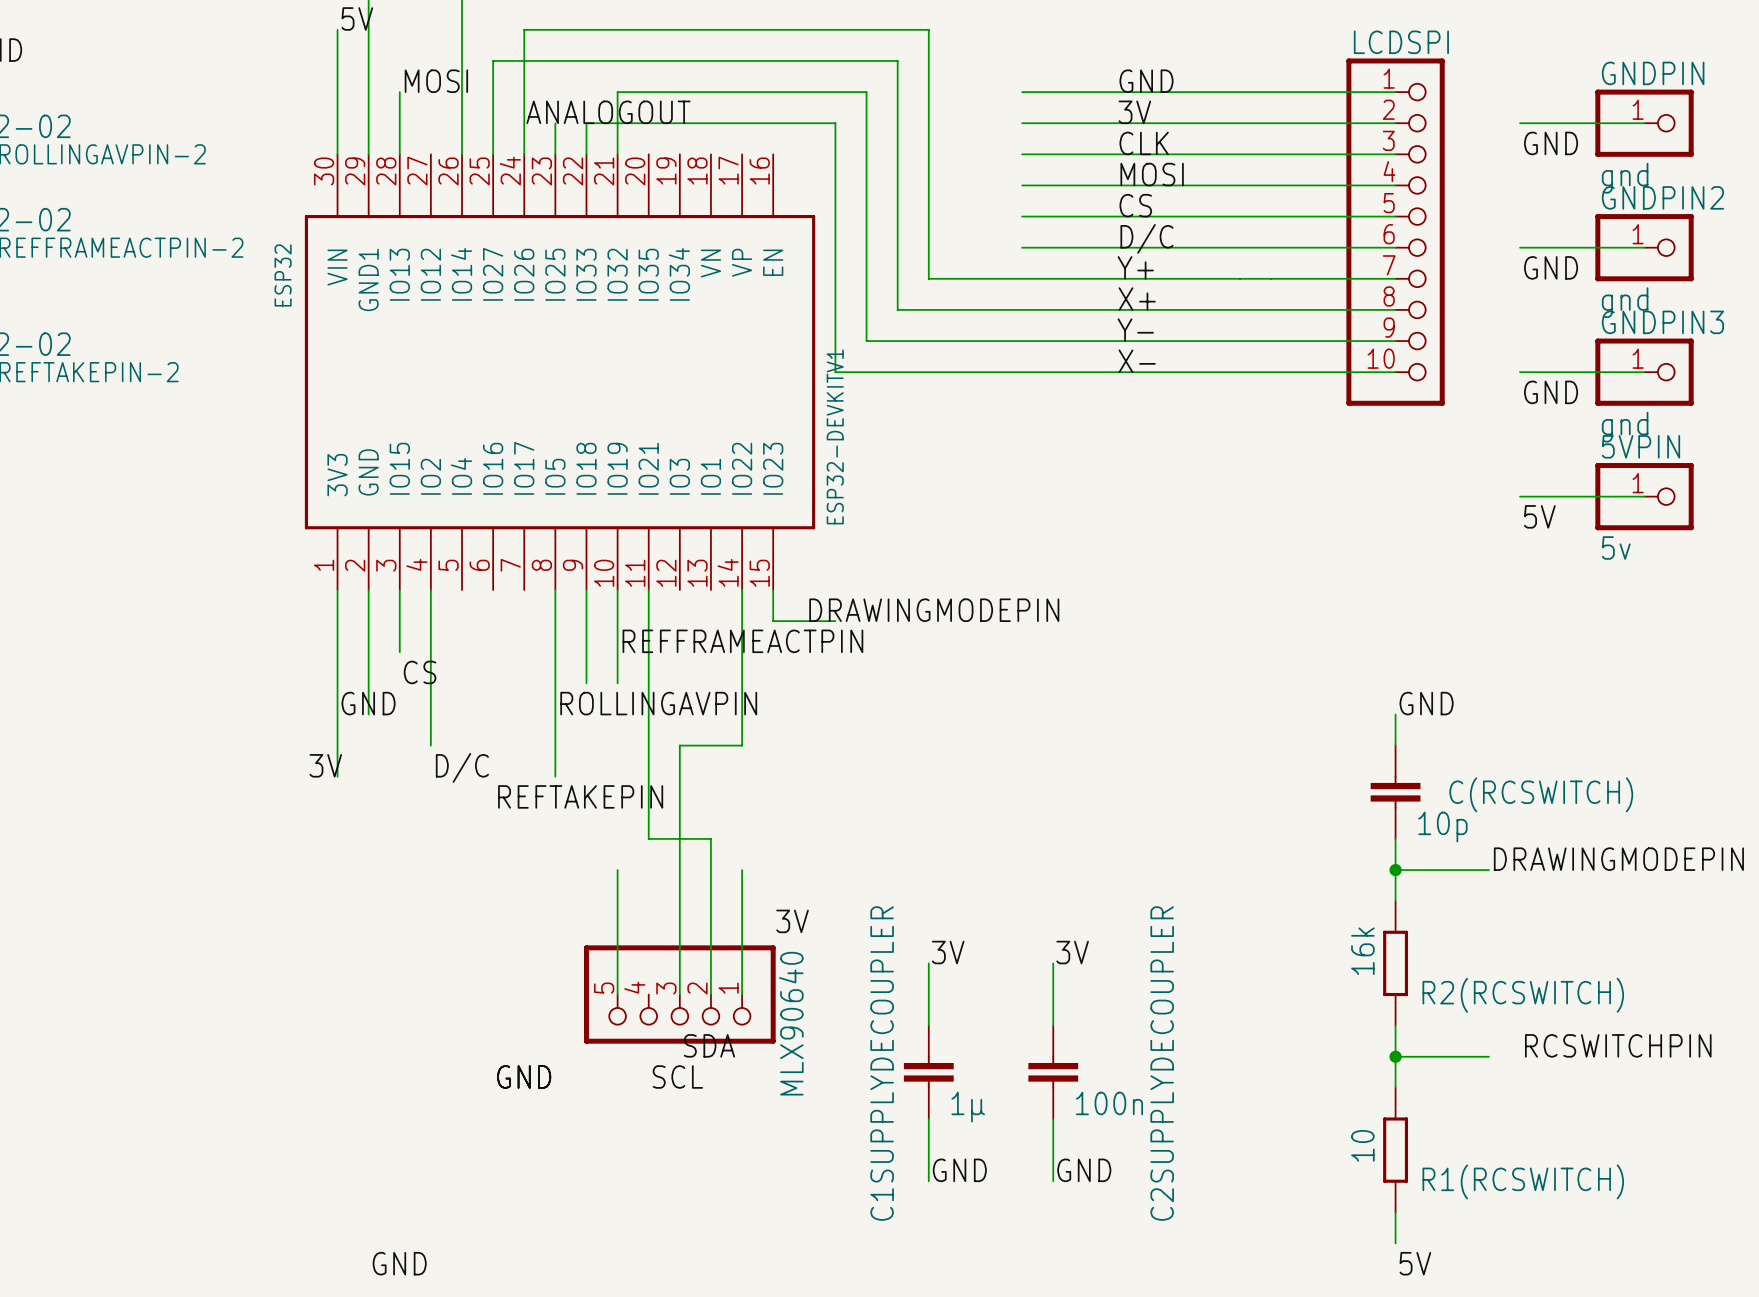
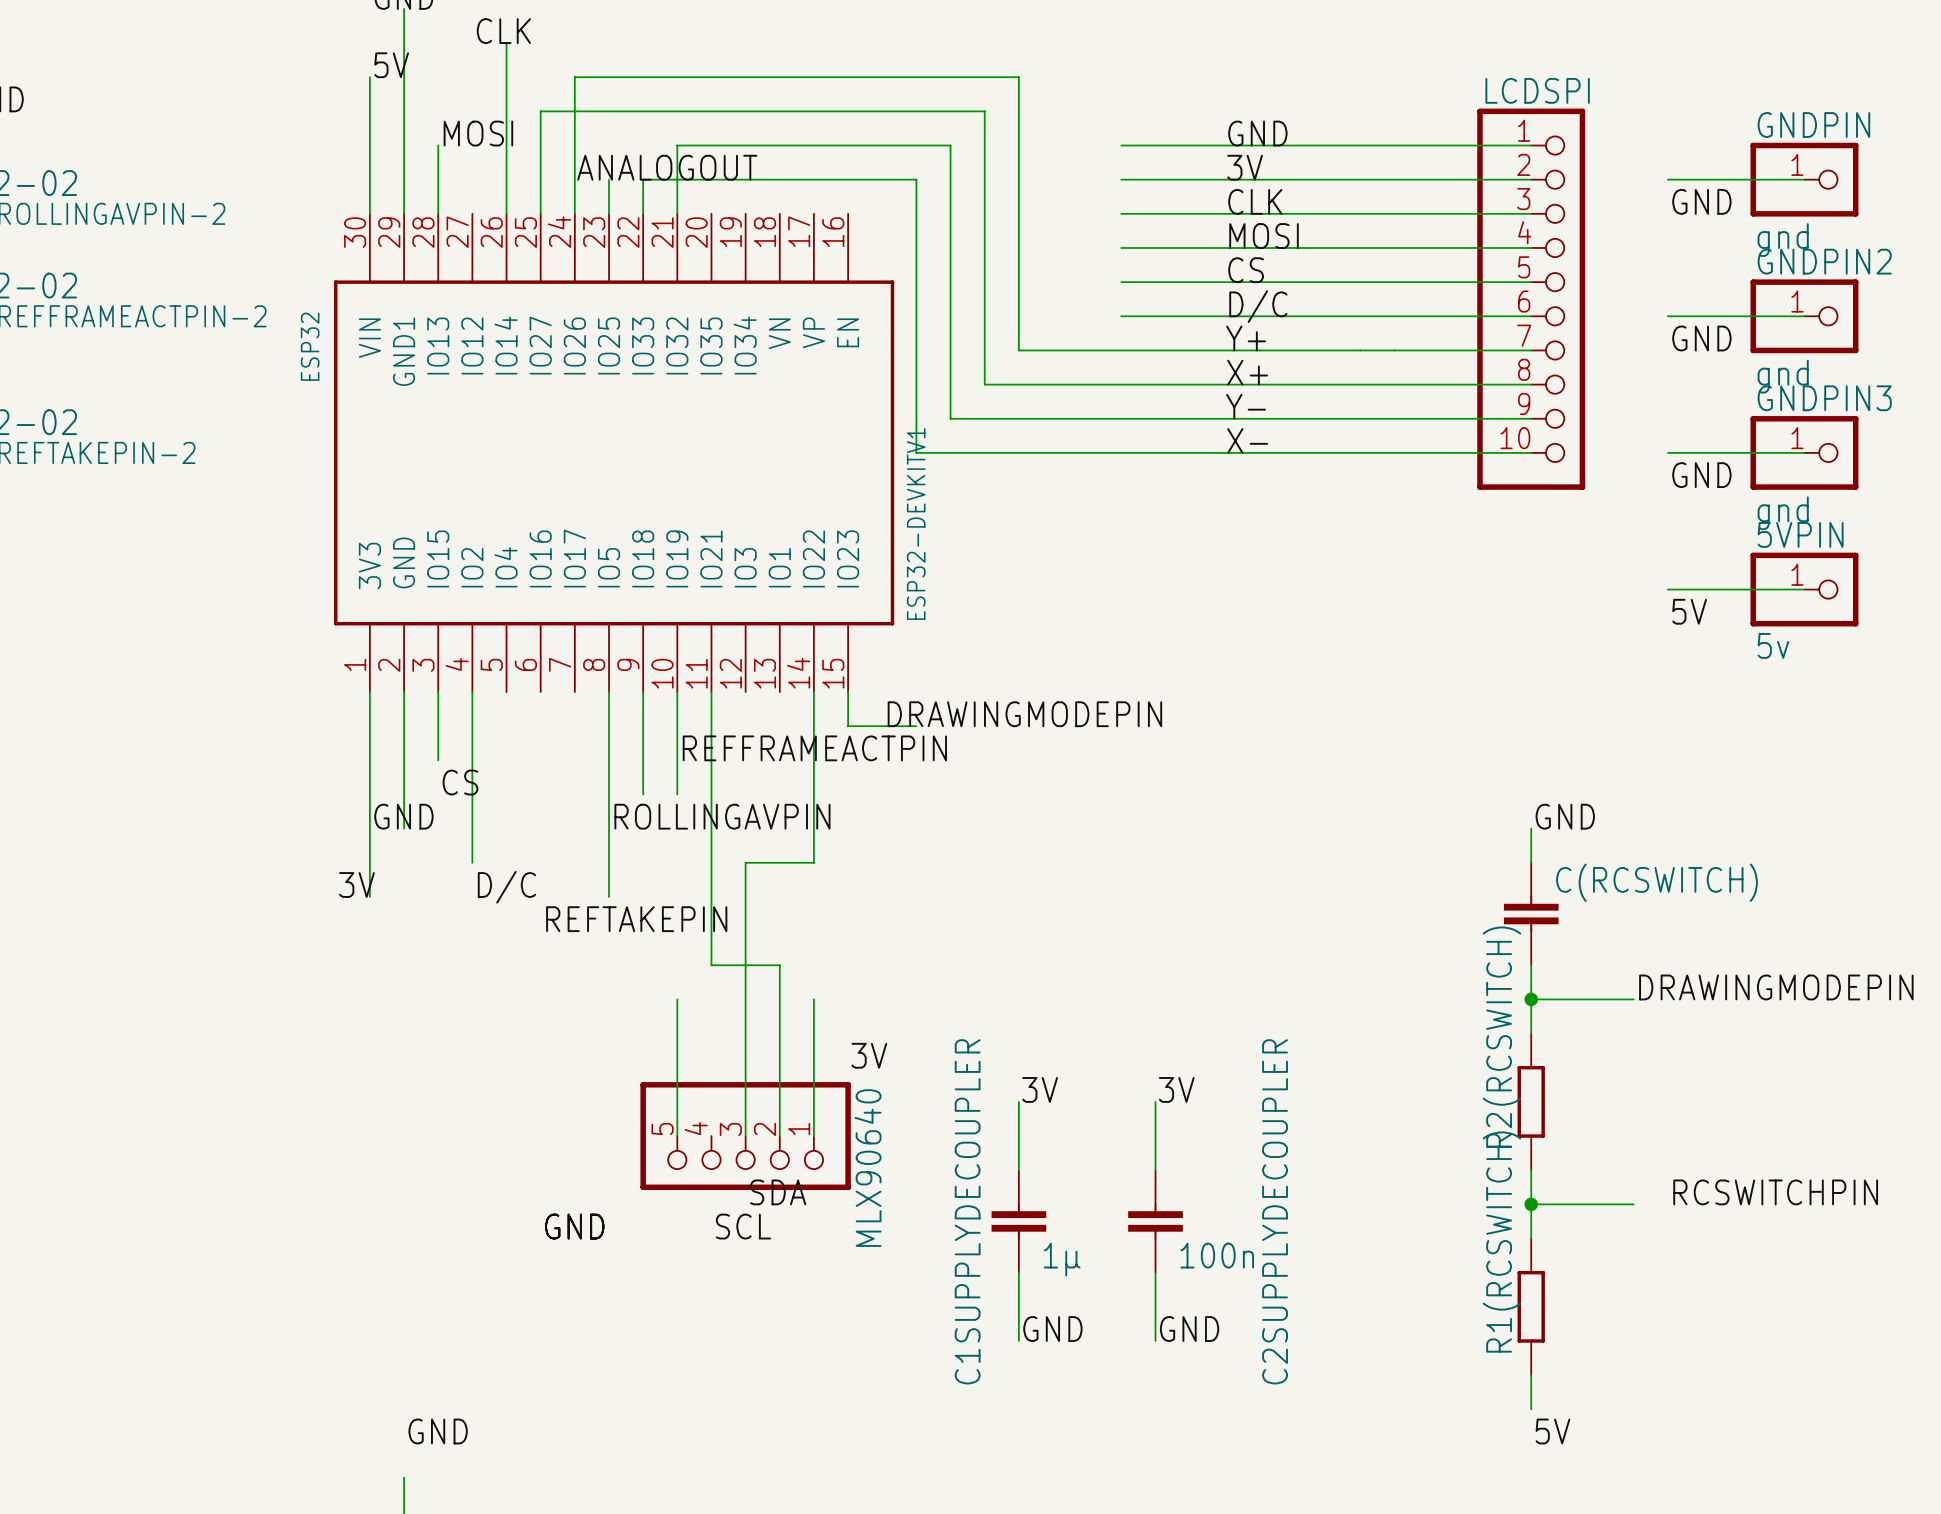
C(RCSWITCH) name position: C(RCSWITCH) (1541, 794) -> C(RCSWITCH) (1656, 882)
C(RCSWITCH) value: 10p (1442, 827) -> none
R2(RCSWITCH) value: 16k (1362, 951) -> none
R2(RCSWITCH) name rotation: 0° (1523, 995) -> 90° counterclockwise (1501, 1037)
R1(RCSWITCH) value: 10 (1362, 1145) -> none
R1(RCSWITCH) name rotation: 0° (1523, 1181) -> 90° counterclockwise (1501, 1242)

